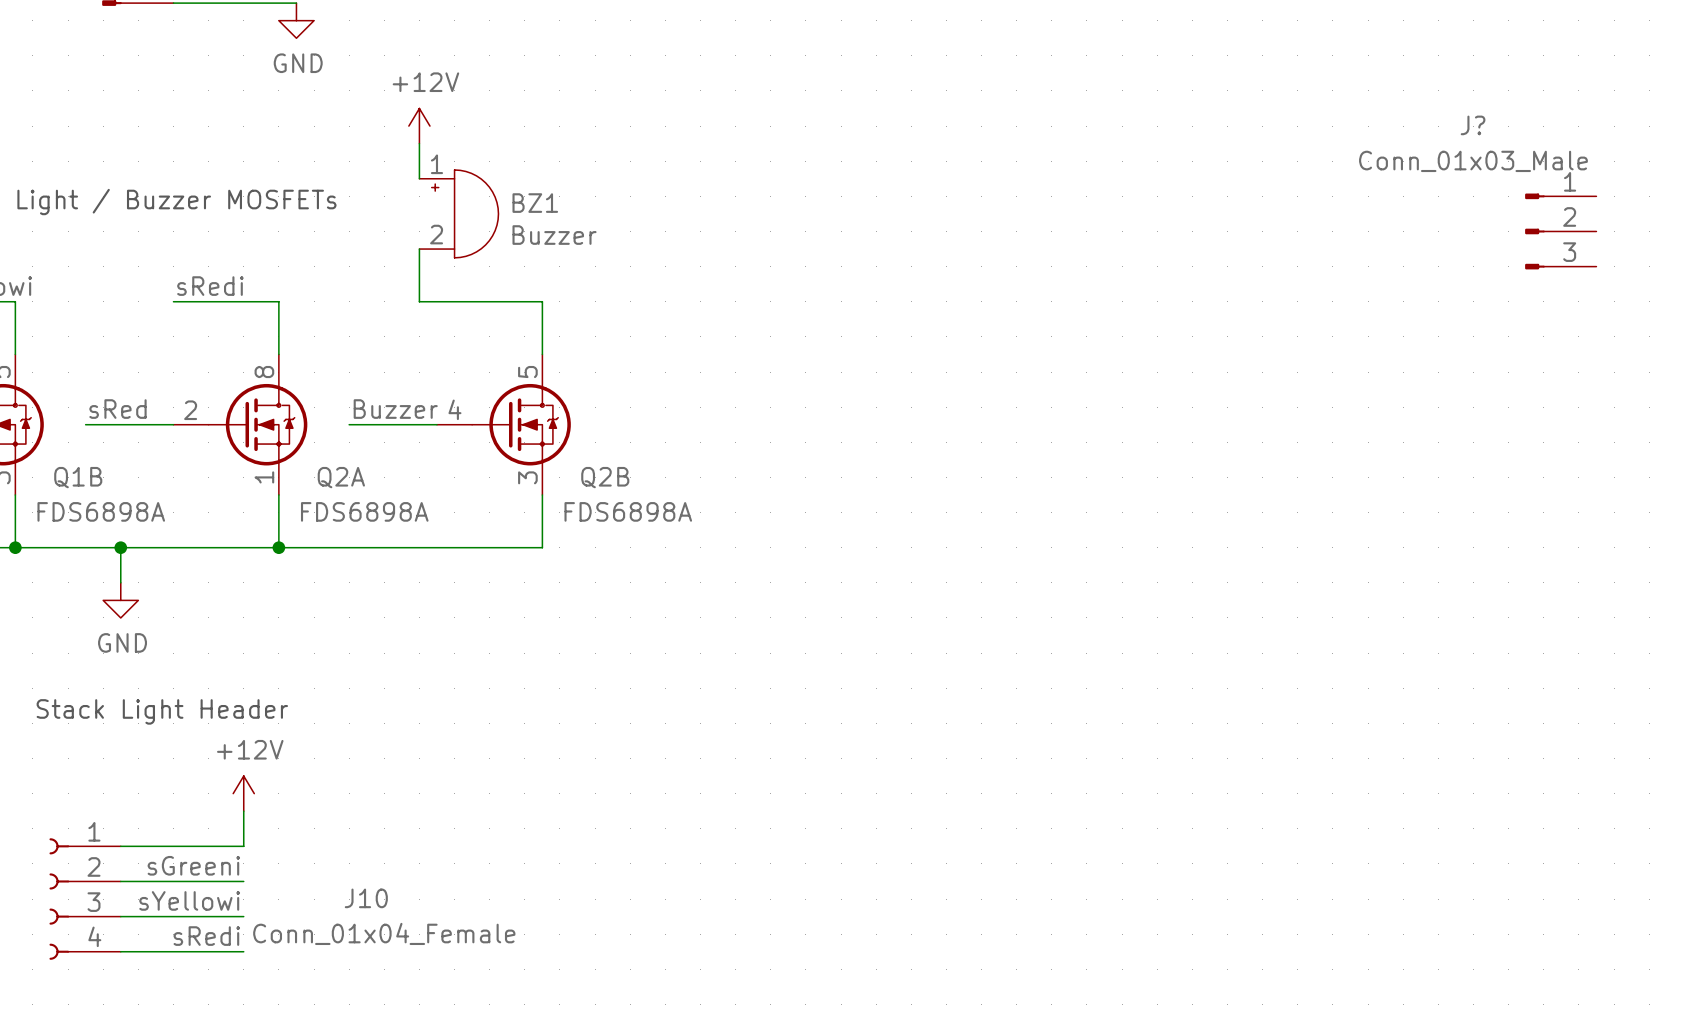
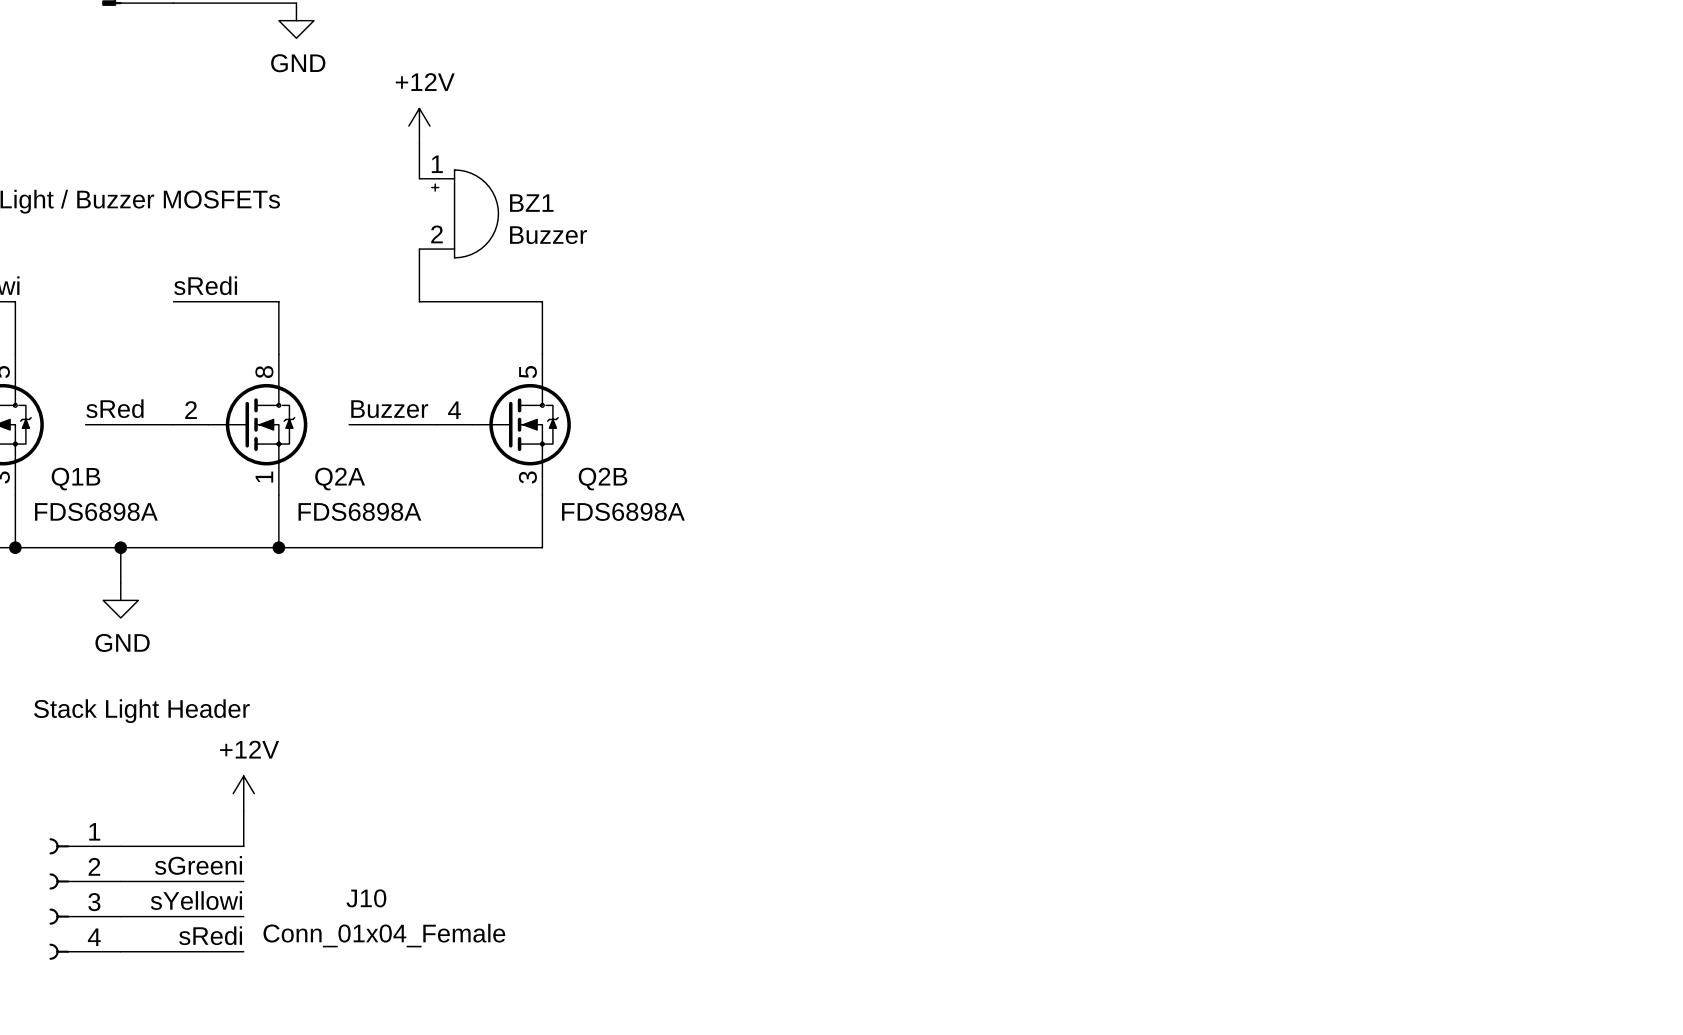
J?: Conn_01x03_Male (1560, 231) -> none

